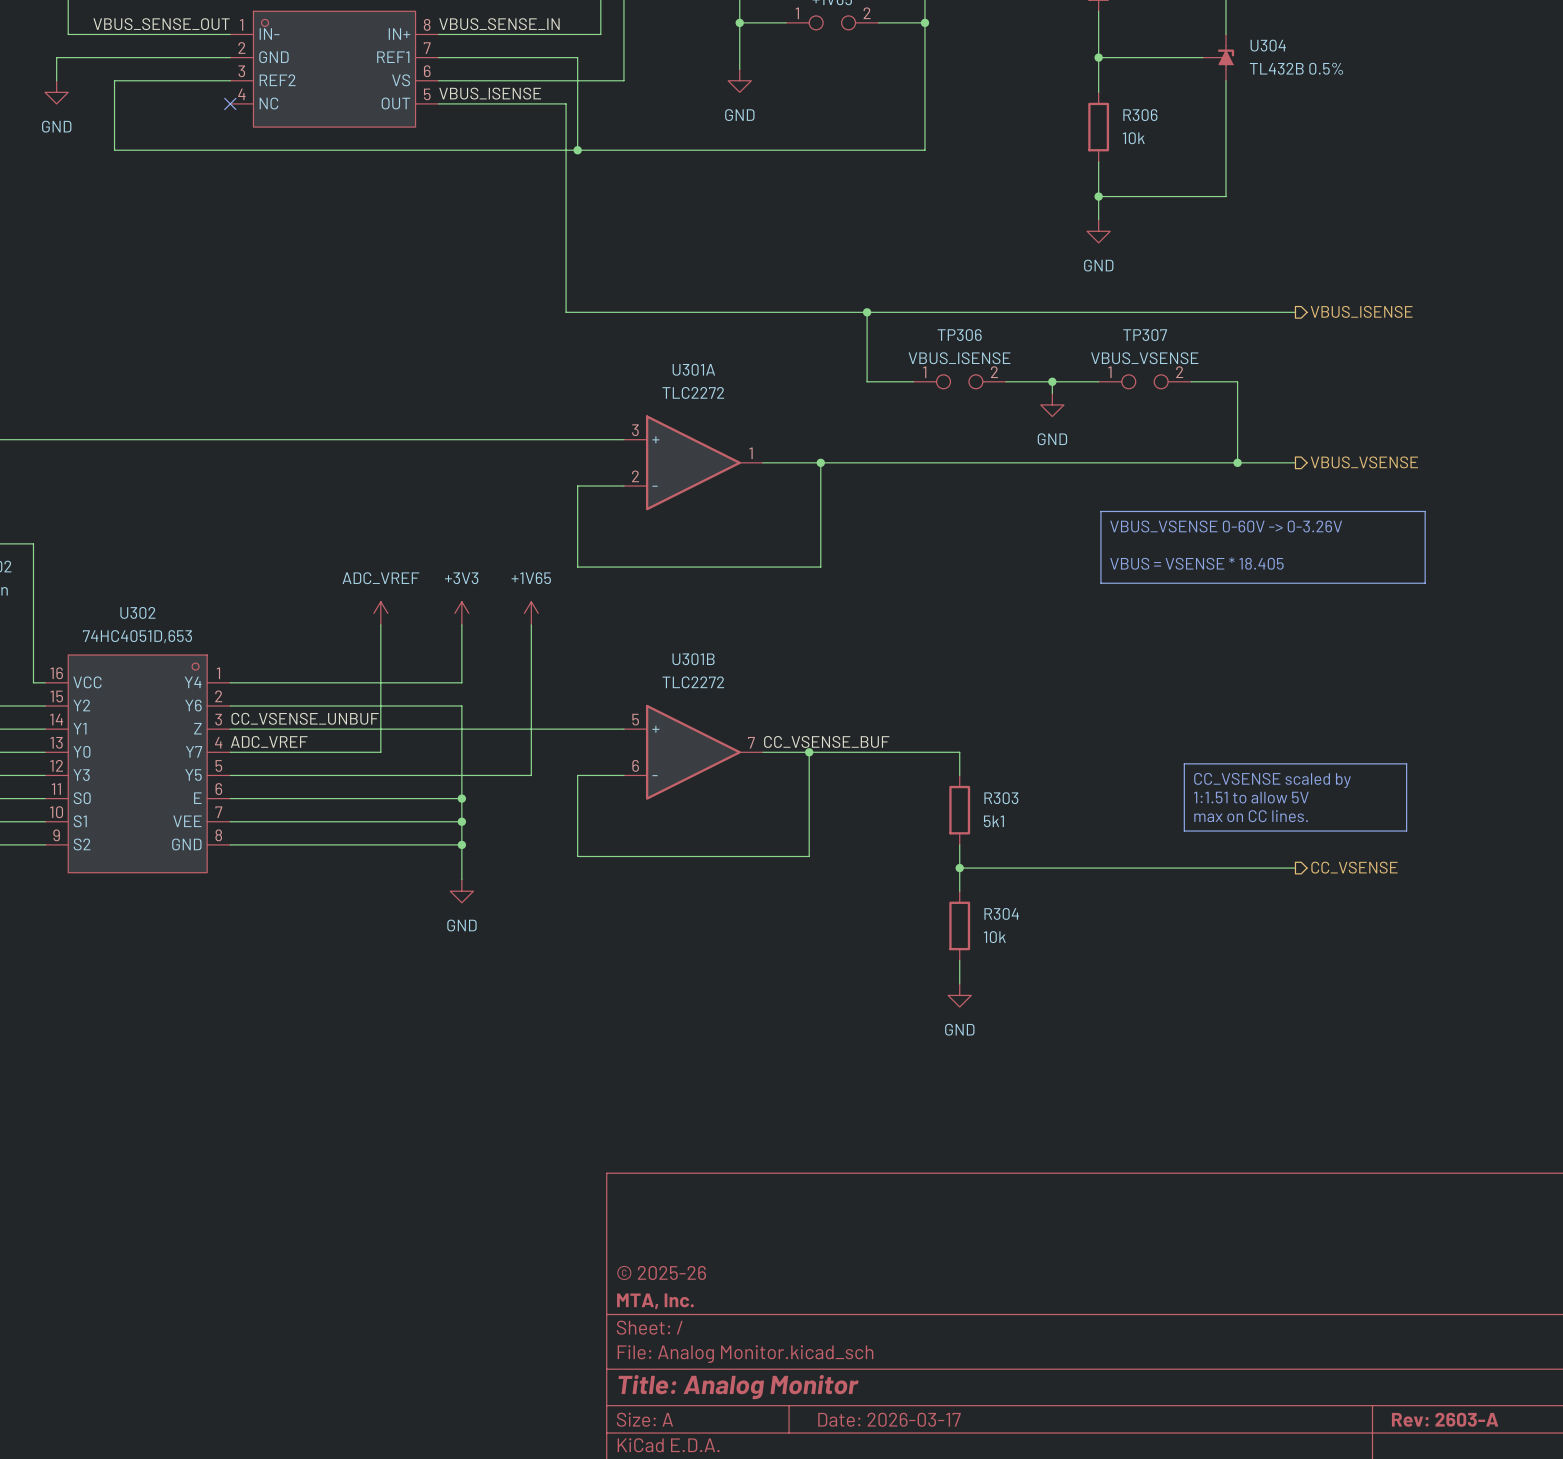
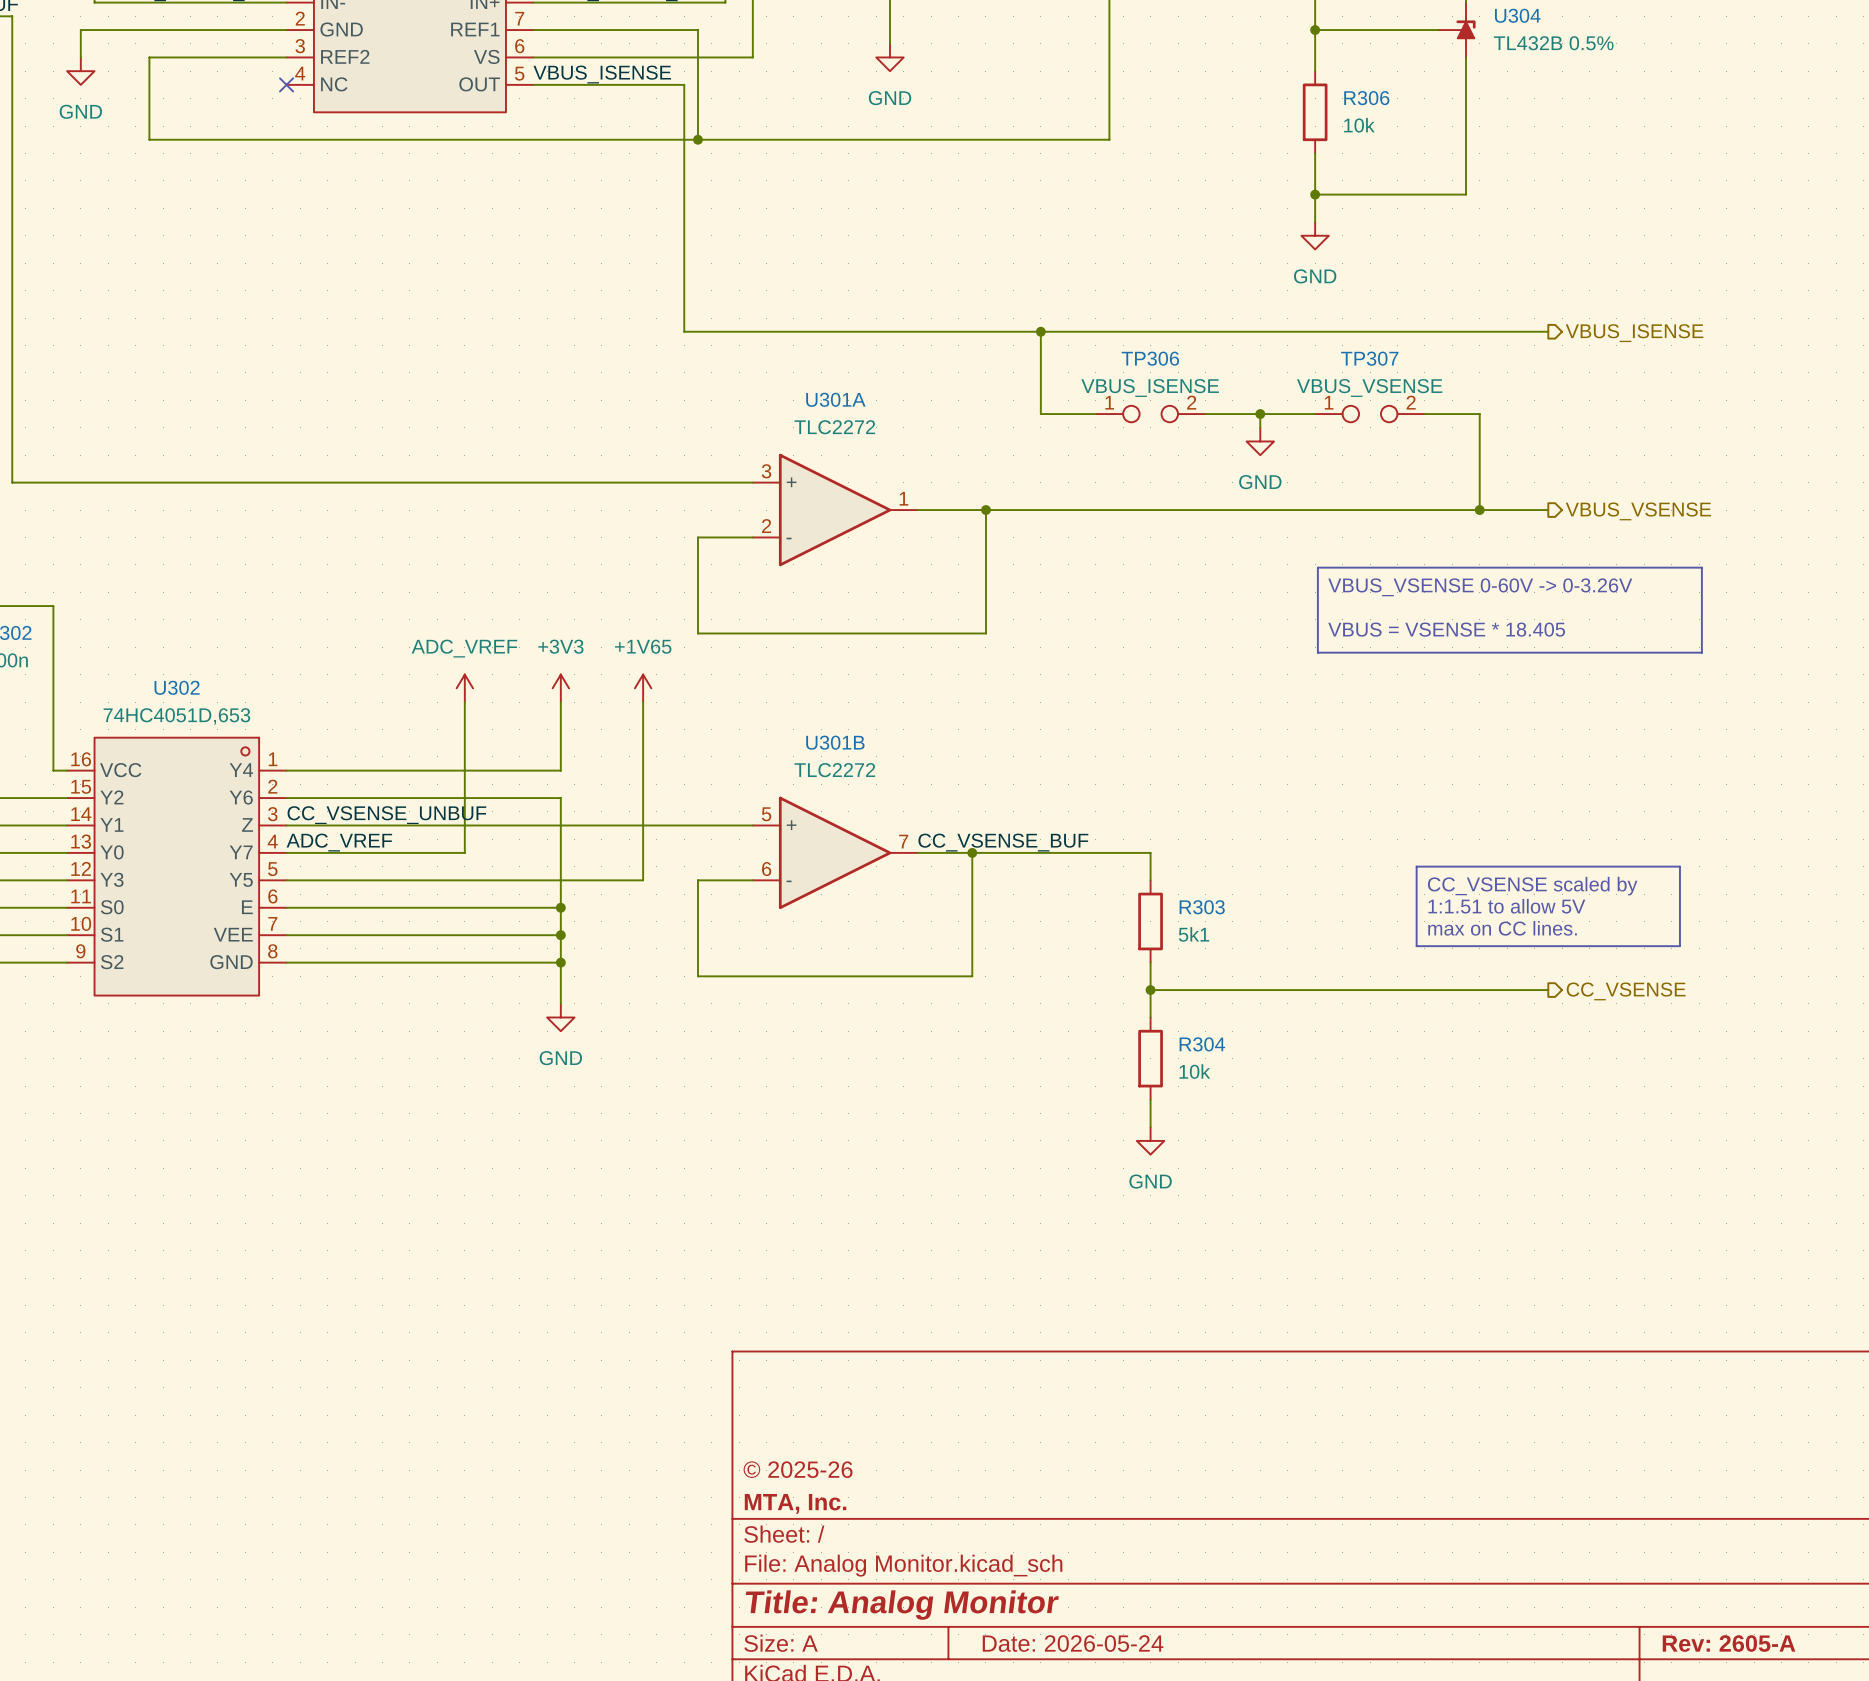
title block: Date: 2026-03-17 (889, 1419) -> Date: 2026-05-24 (1073, 1643)
title block: Rev: 2603-A (1445, 1419) -> Rev: 2605-A (1729, 1643)

